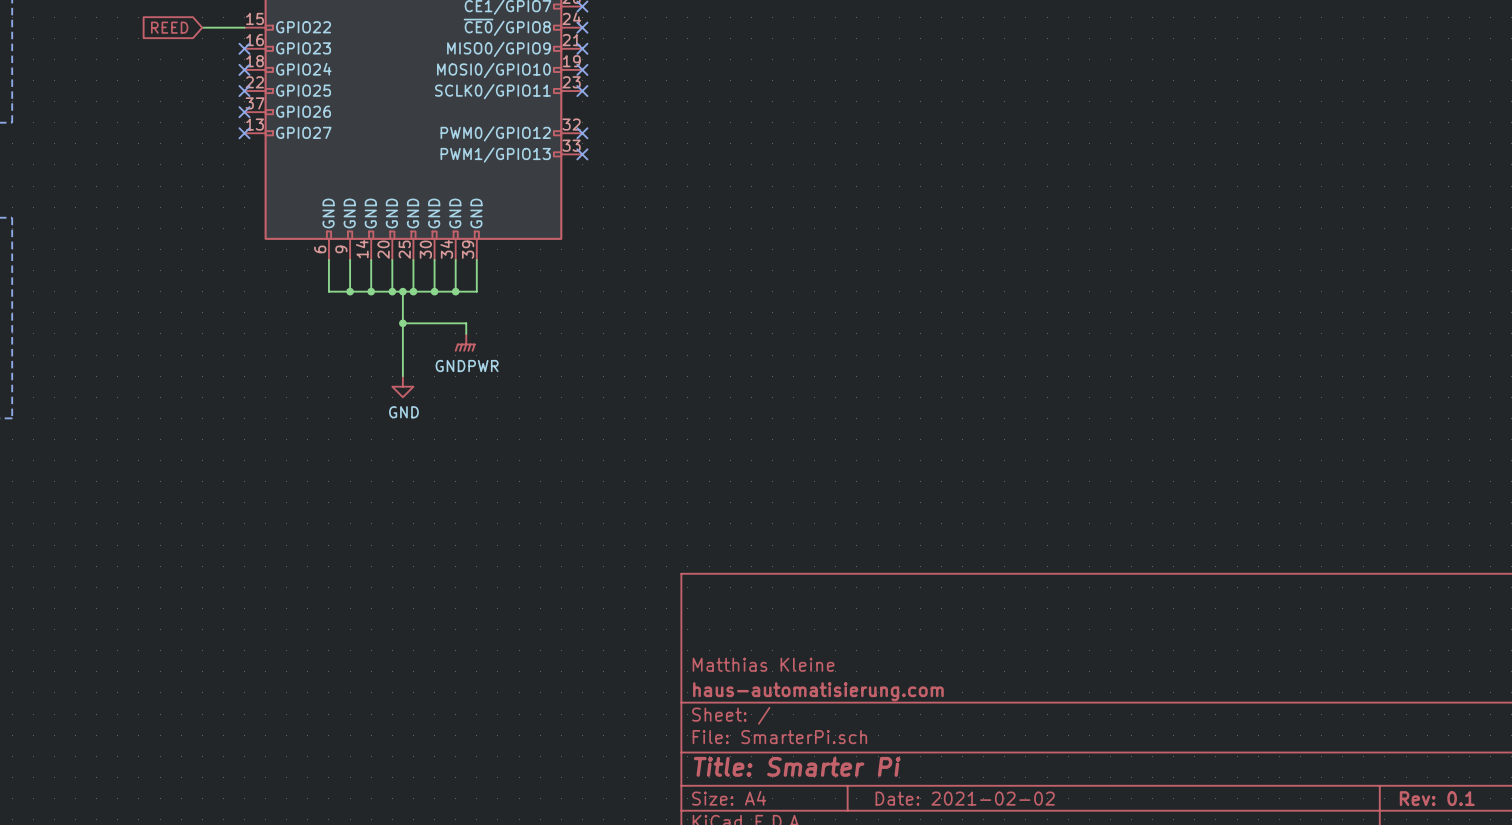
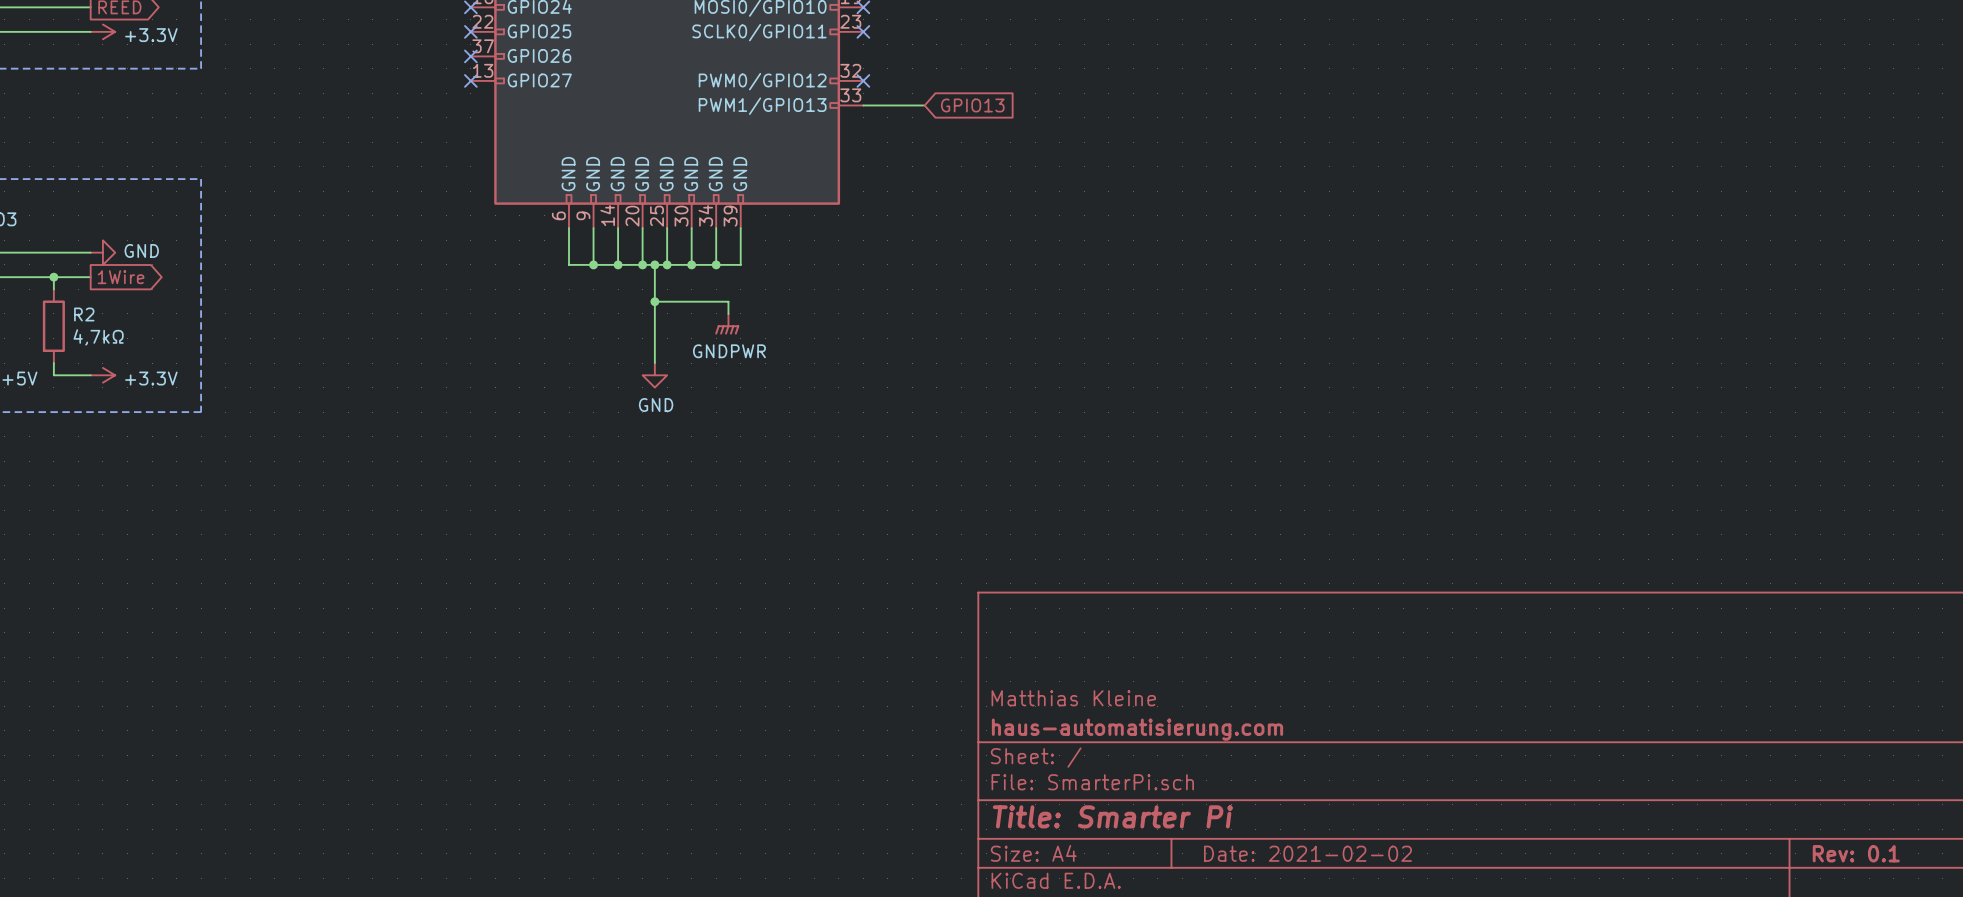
wire: none -> (863, 105) (924, 105)
no-connect mark: (582, 154) -> none
global label: none -> GPIO13 (972, 105)

